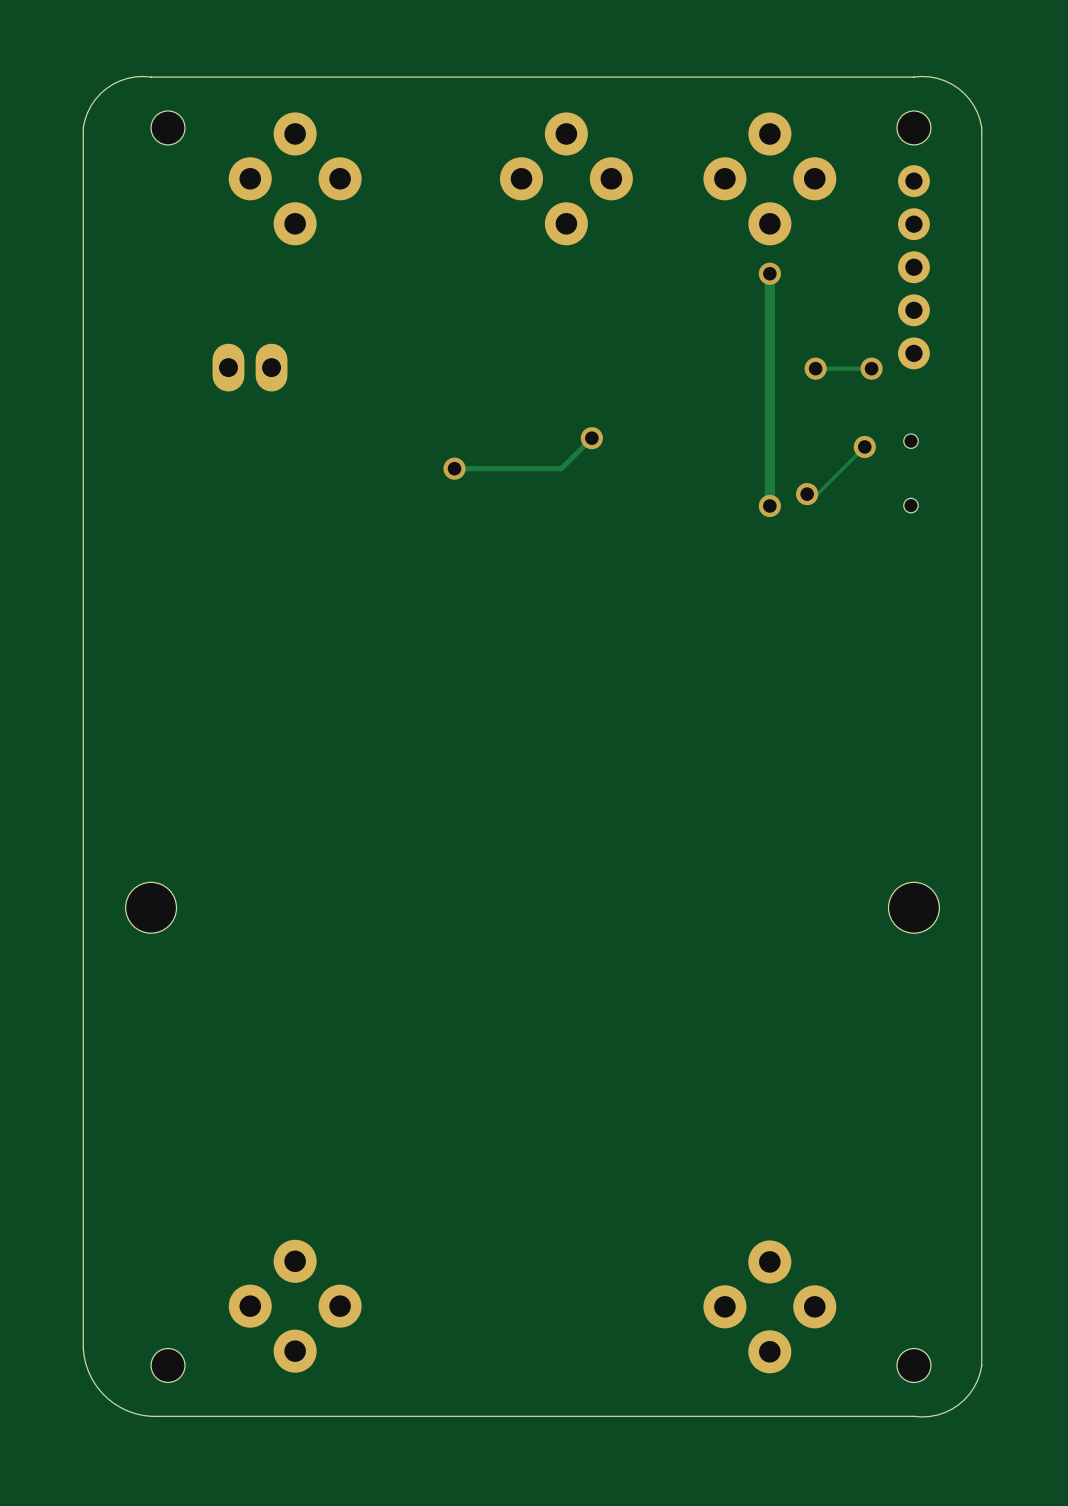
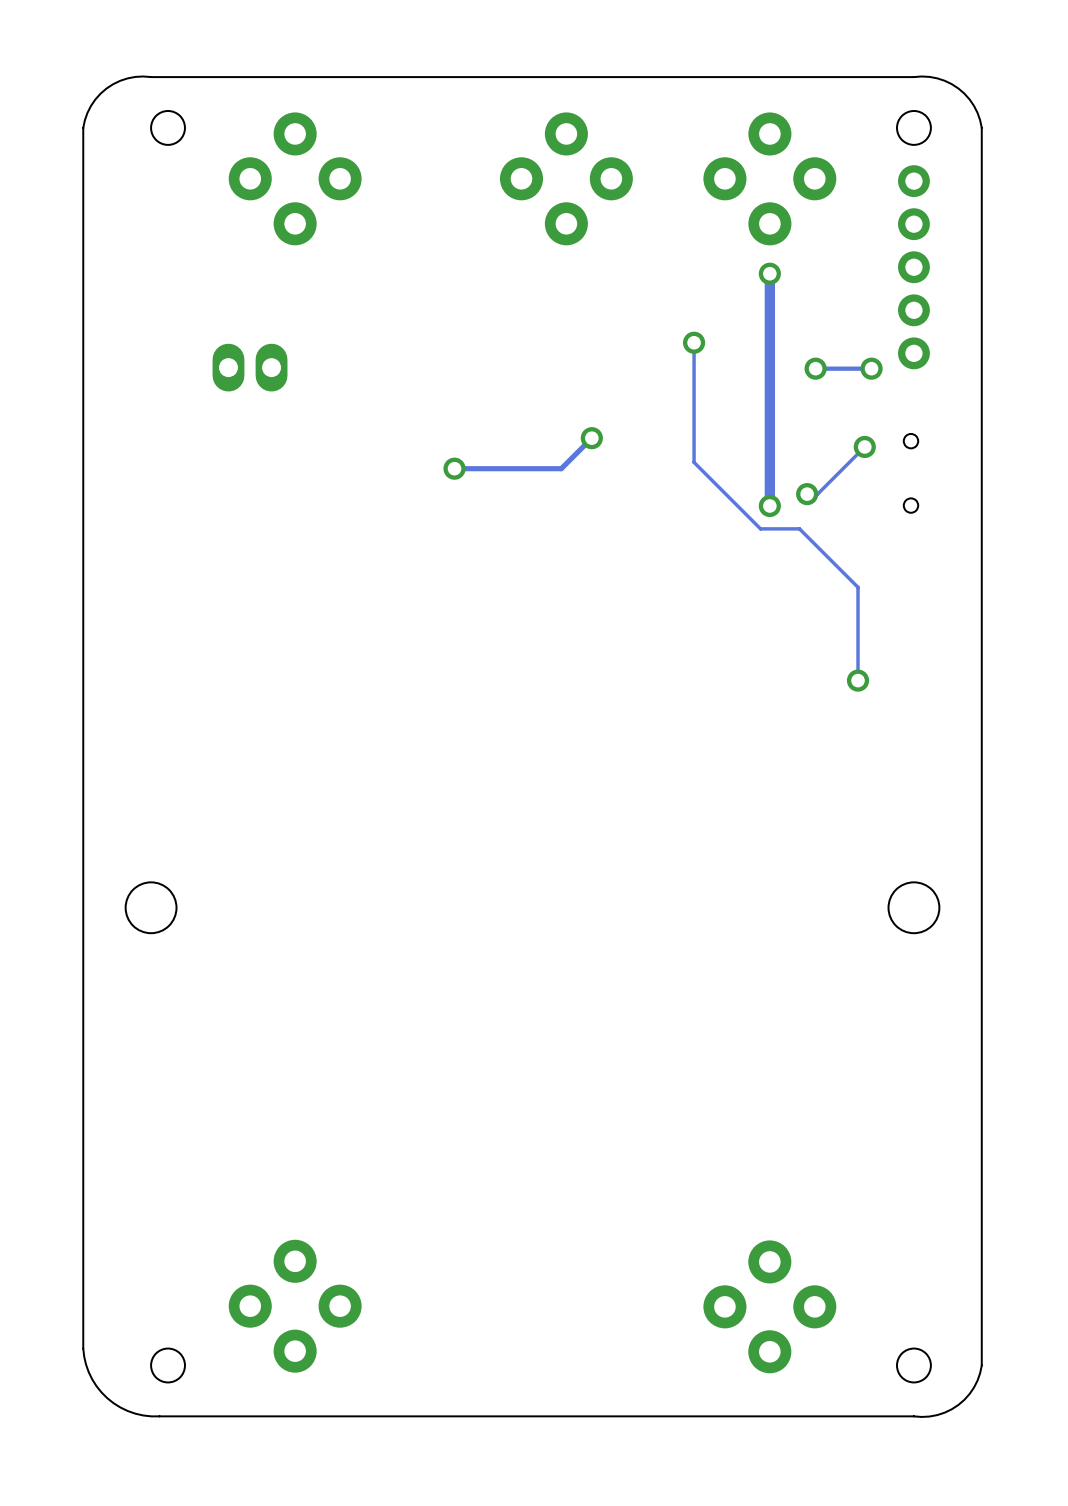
track: none -> (694, 342) (694, 462) (760, 528) (799, 528) (858, 587) (858, 680)
via: none -> (694, 342)
via: none -> (858, 680)

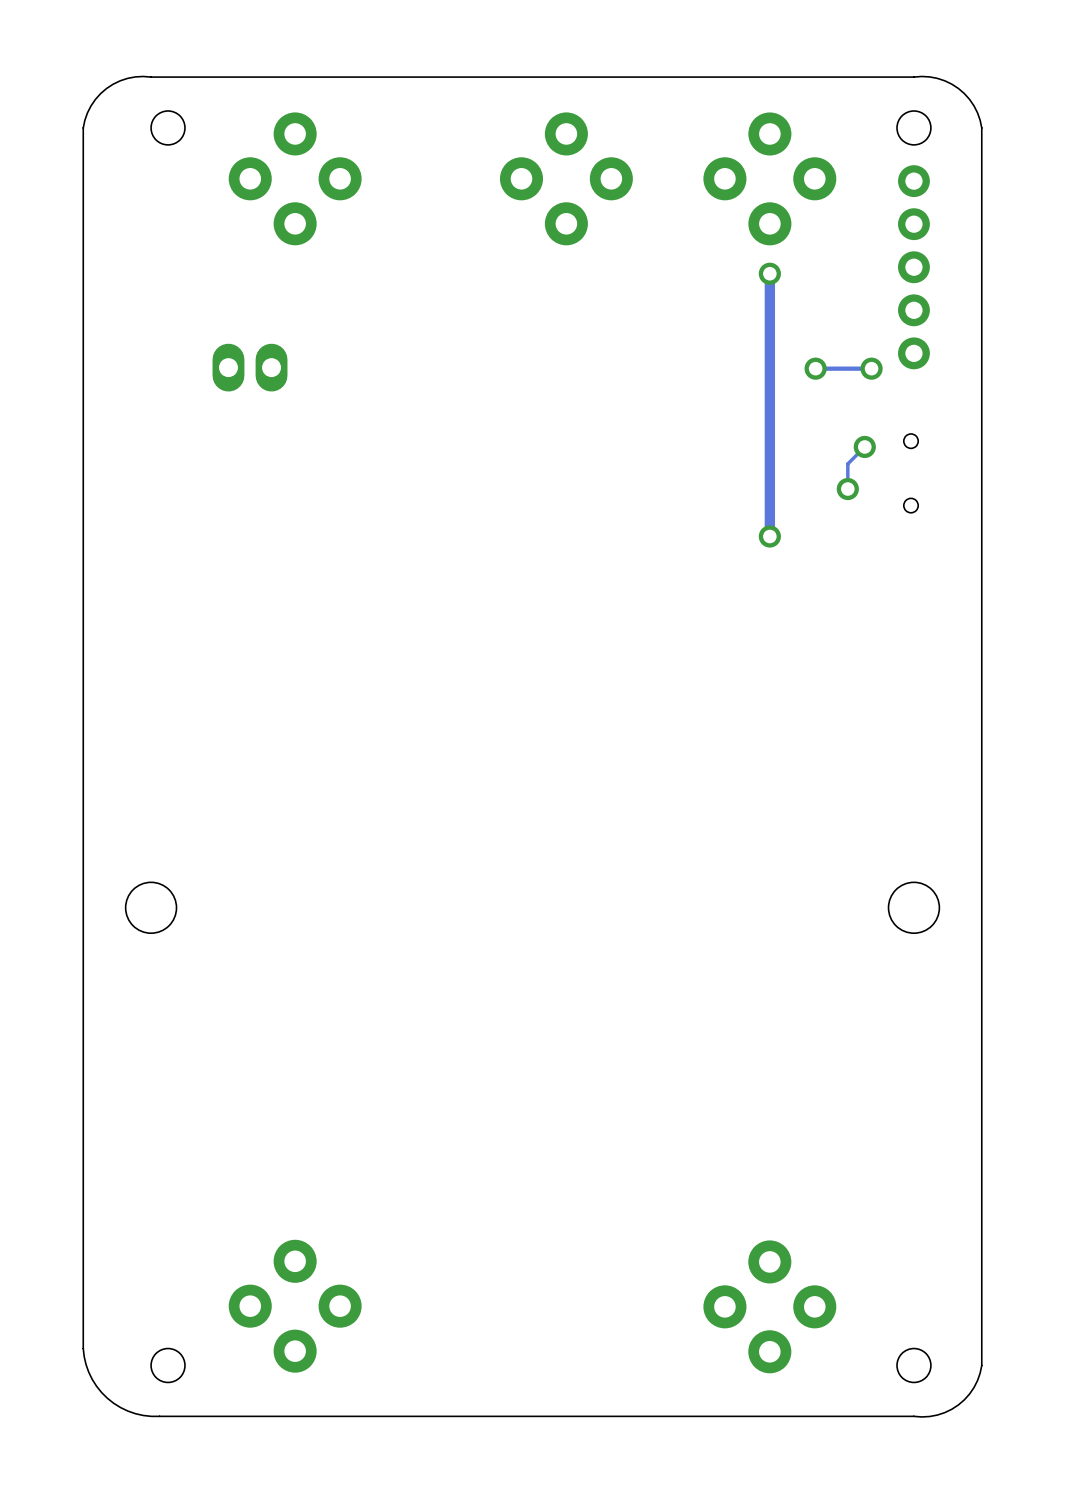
track: (694, 342) (694, 462) (760, 528) (799, 528) (858, 587) (858, 680) -> none
via: (694, 342) -> none
track: (591, 438) (561, 468) (454, 468) -> none
via: (591, 438) -> none
track: (847, 463) (817, 494) (807, 494) -> (847, 463) (847, 489)
via: (454, 468) -> none
via: none -> (847, 489)
via: (807, 494) -> none
track: none -> (769, 505) (769, 536)
via: (769, 505) -> none
via: none -> (769, 536)
via: (858, 680) -> none

